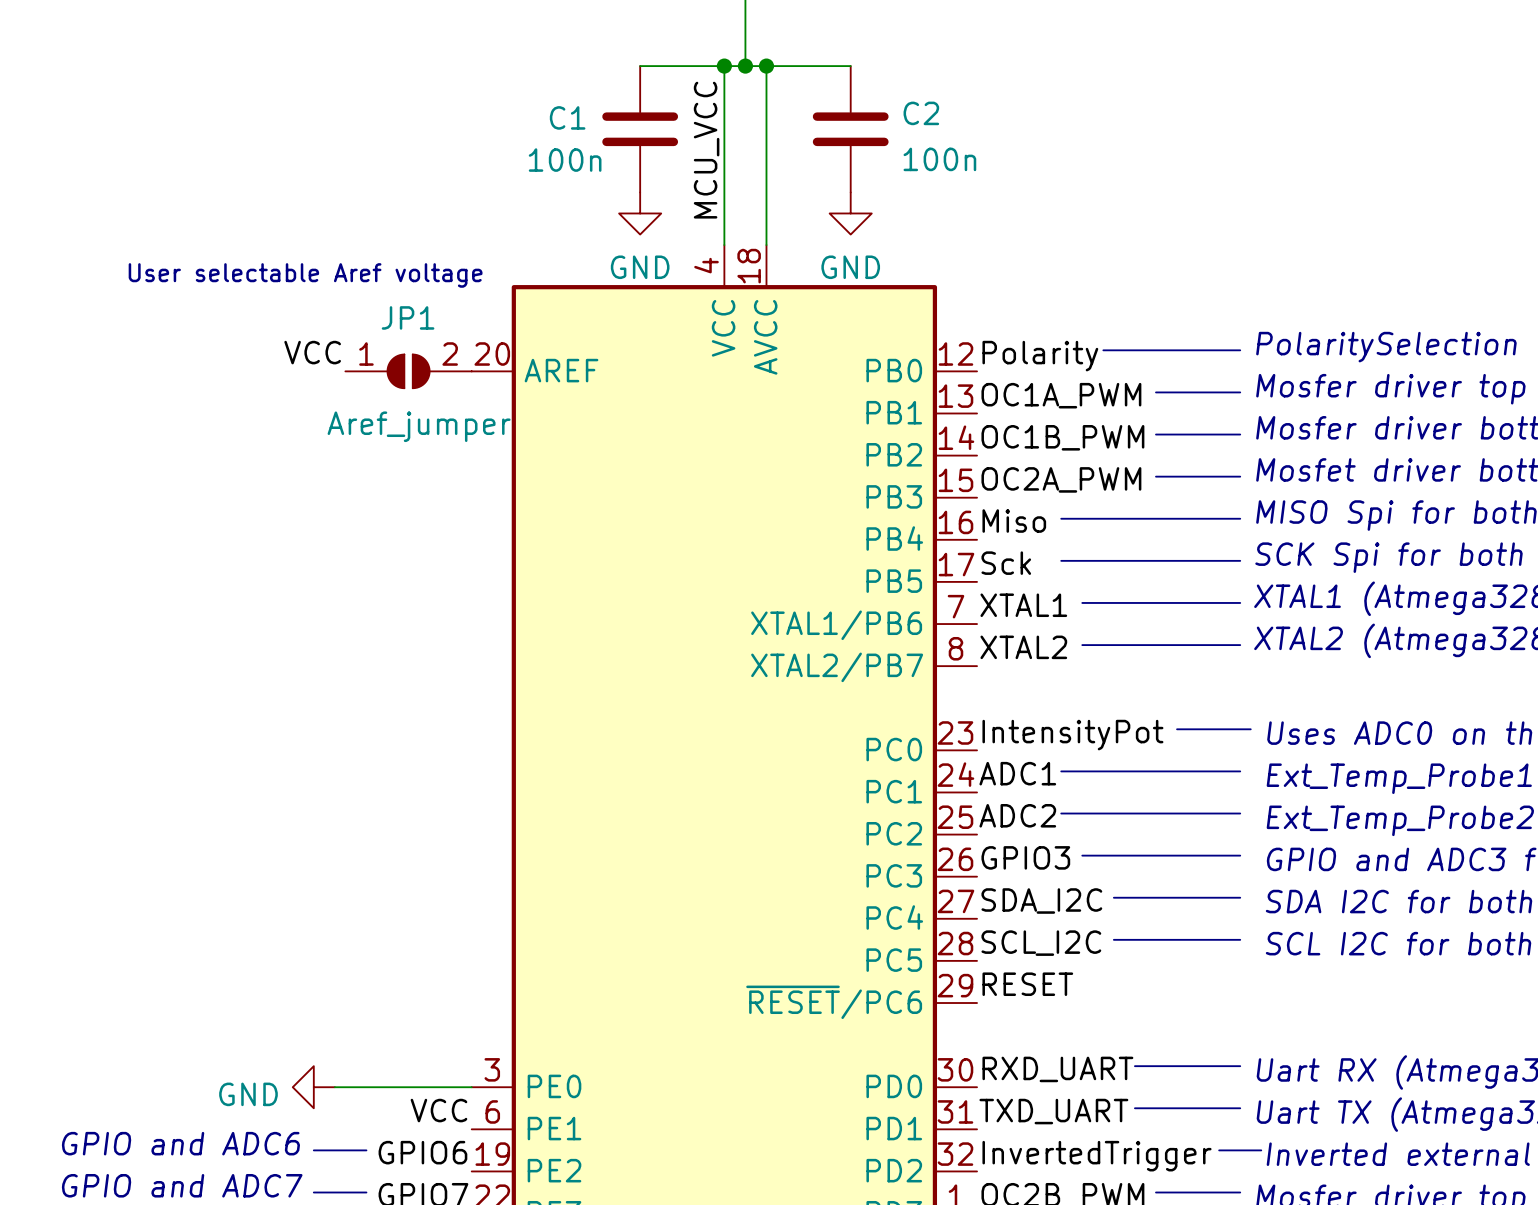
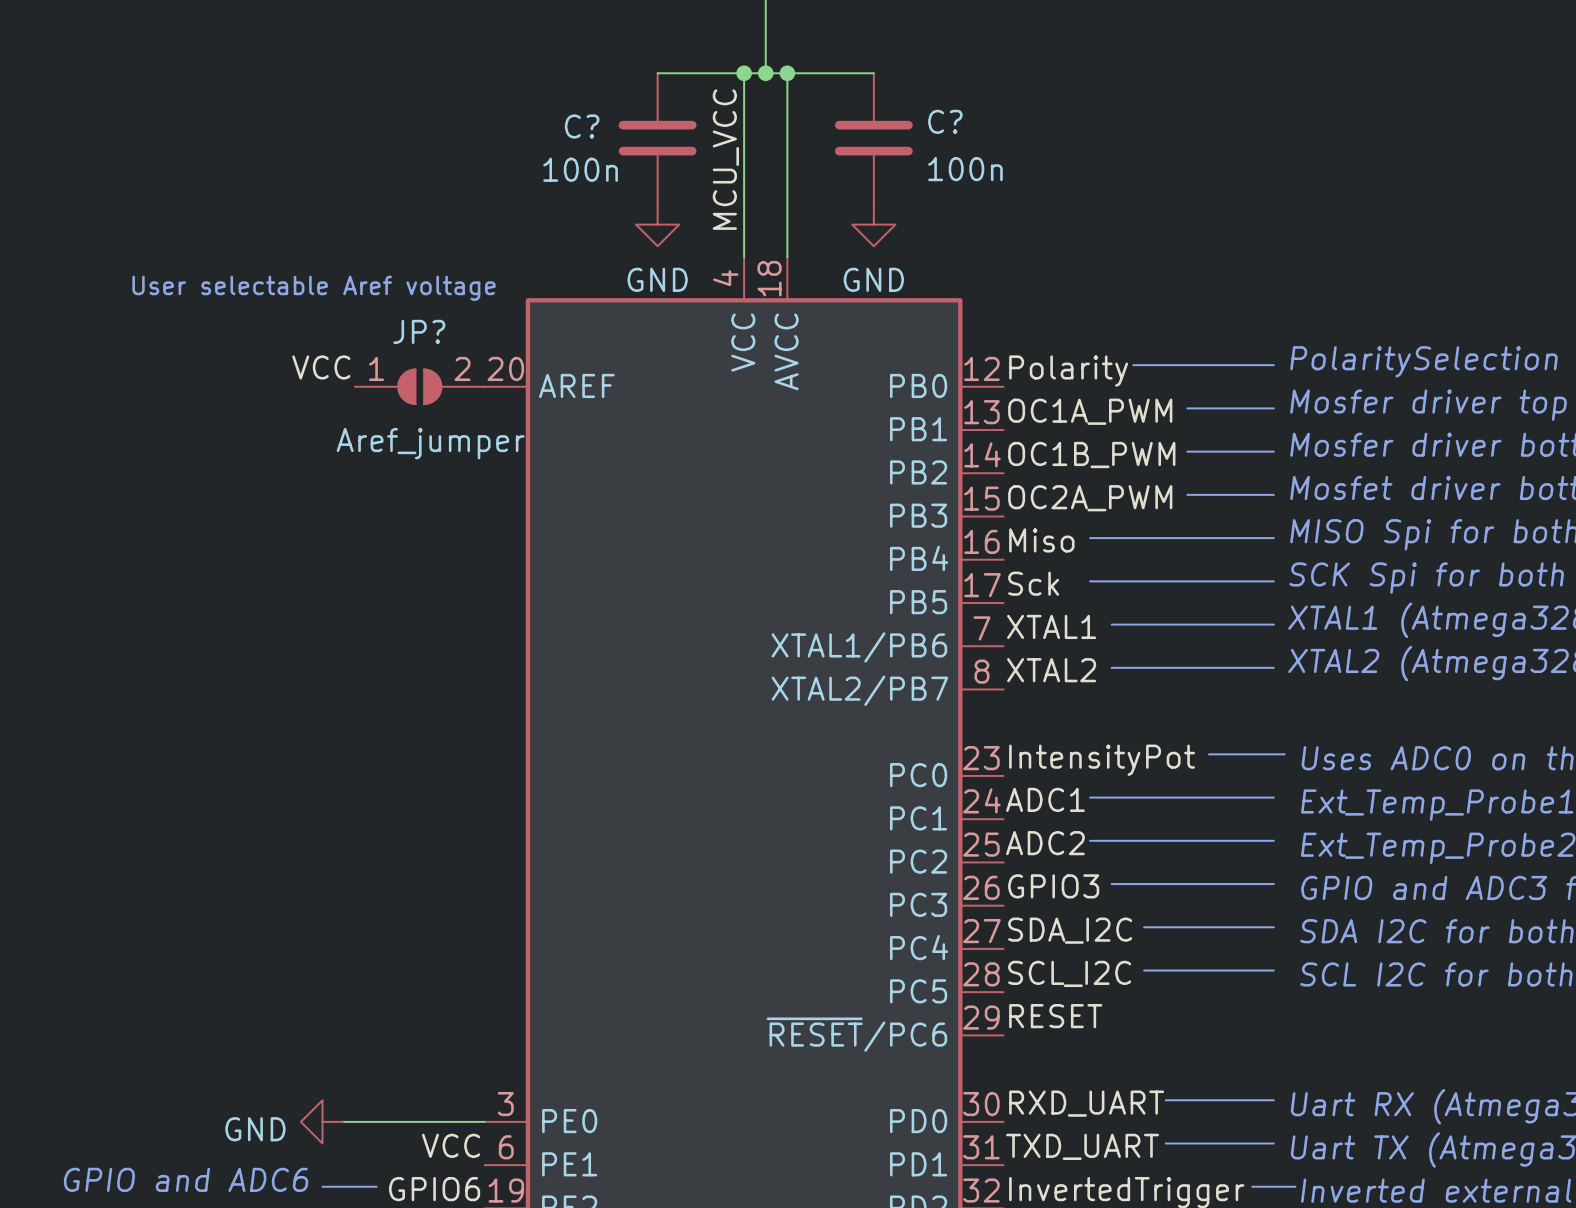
C2 name: C2 (921, 113) -> C? (945, 121)
C1 name: C1 (567, 117) -> C? (582, 126)
JP1 name: JP1 (408, 317) -> JP? (419, 331)

